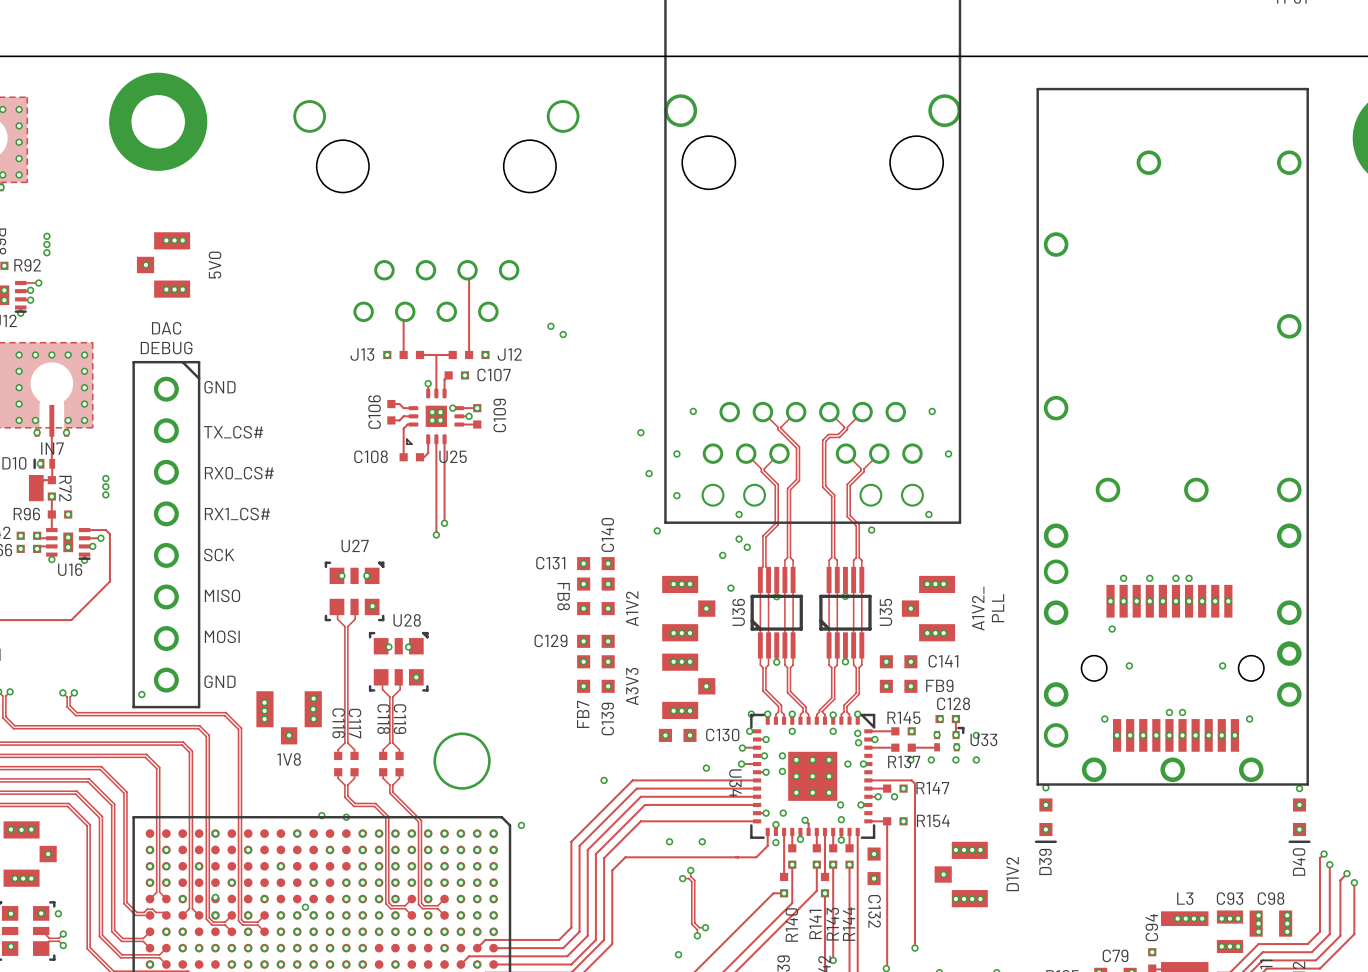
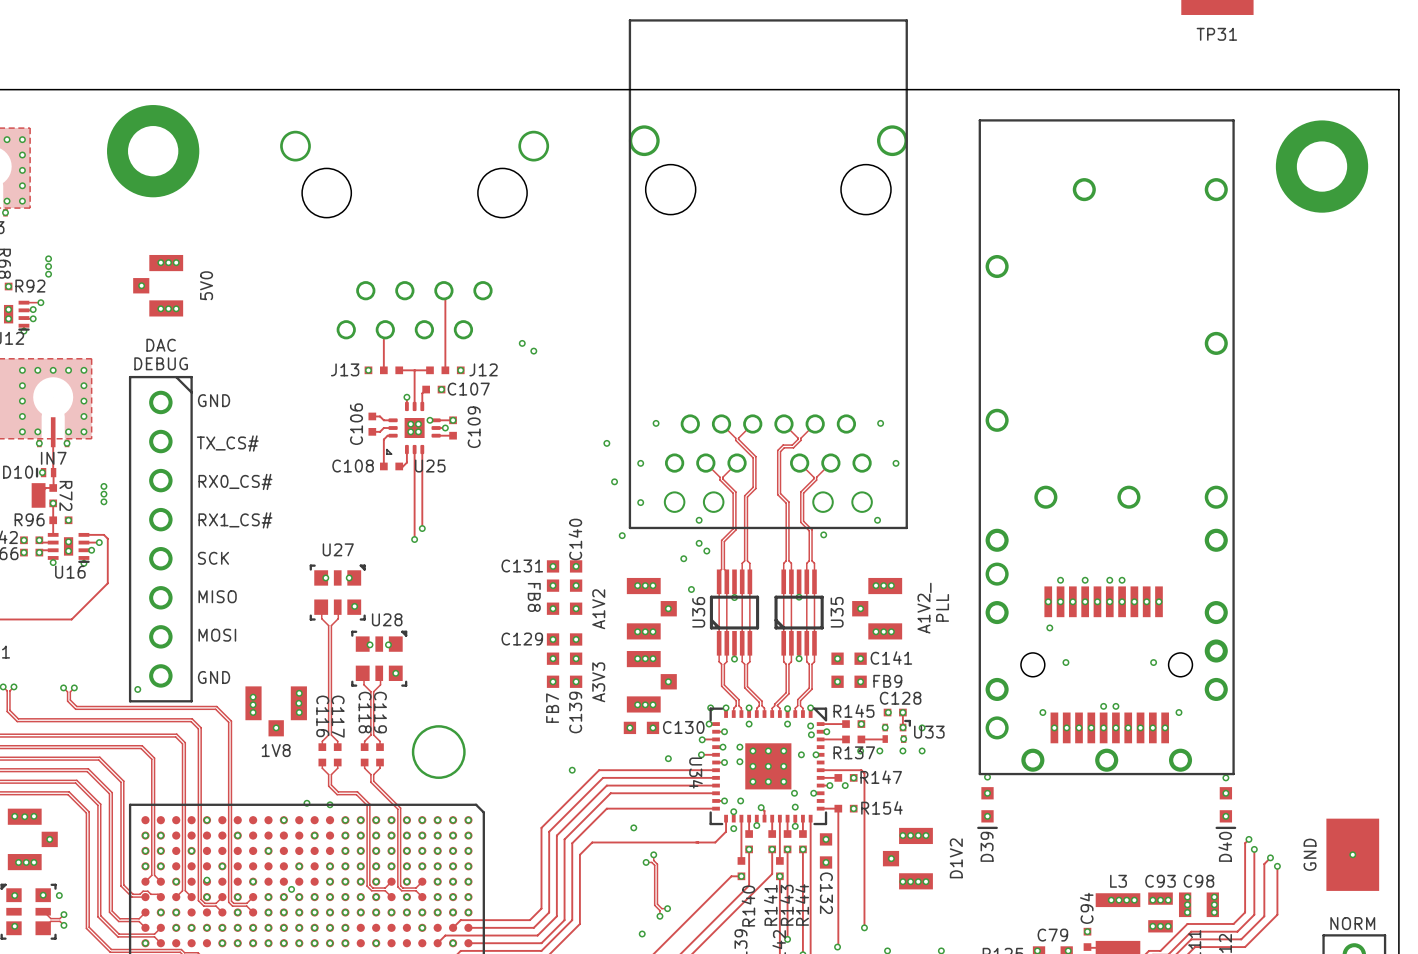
via: (521, 825) -> none
via: (702, 841) -> none

